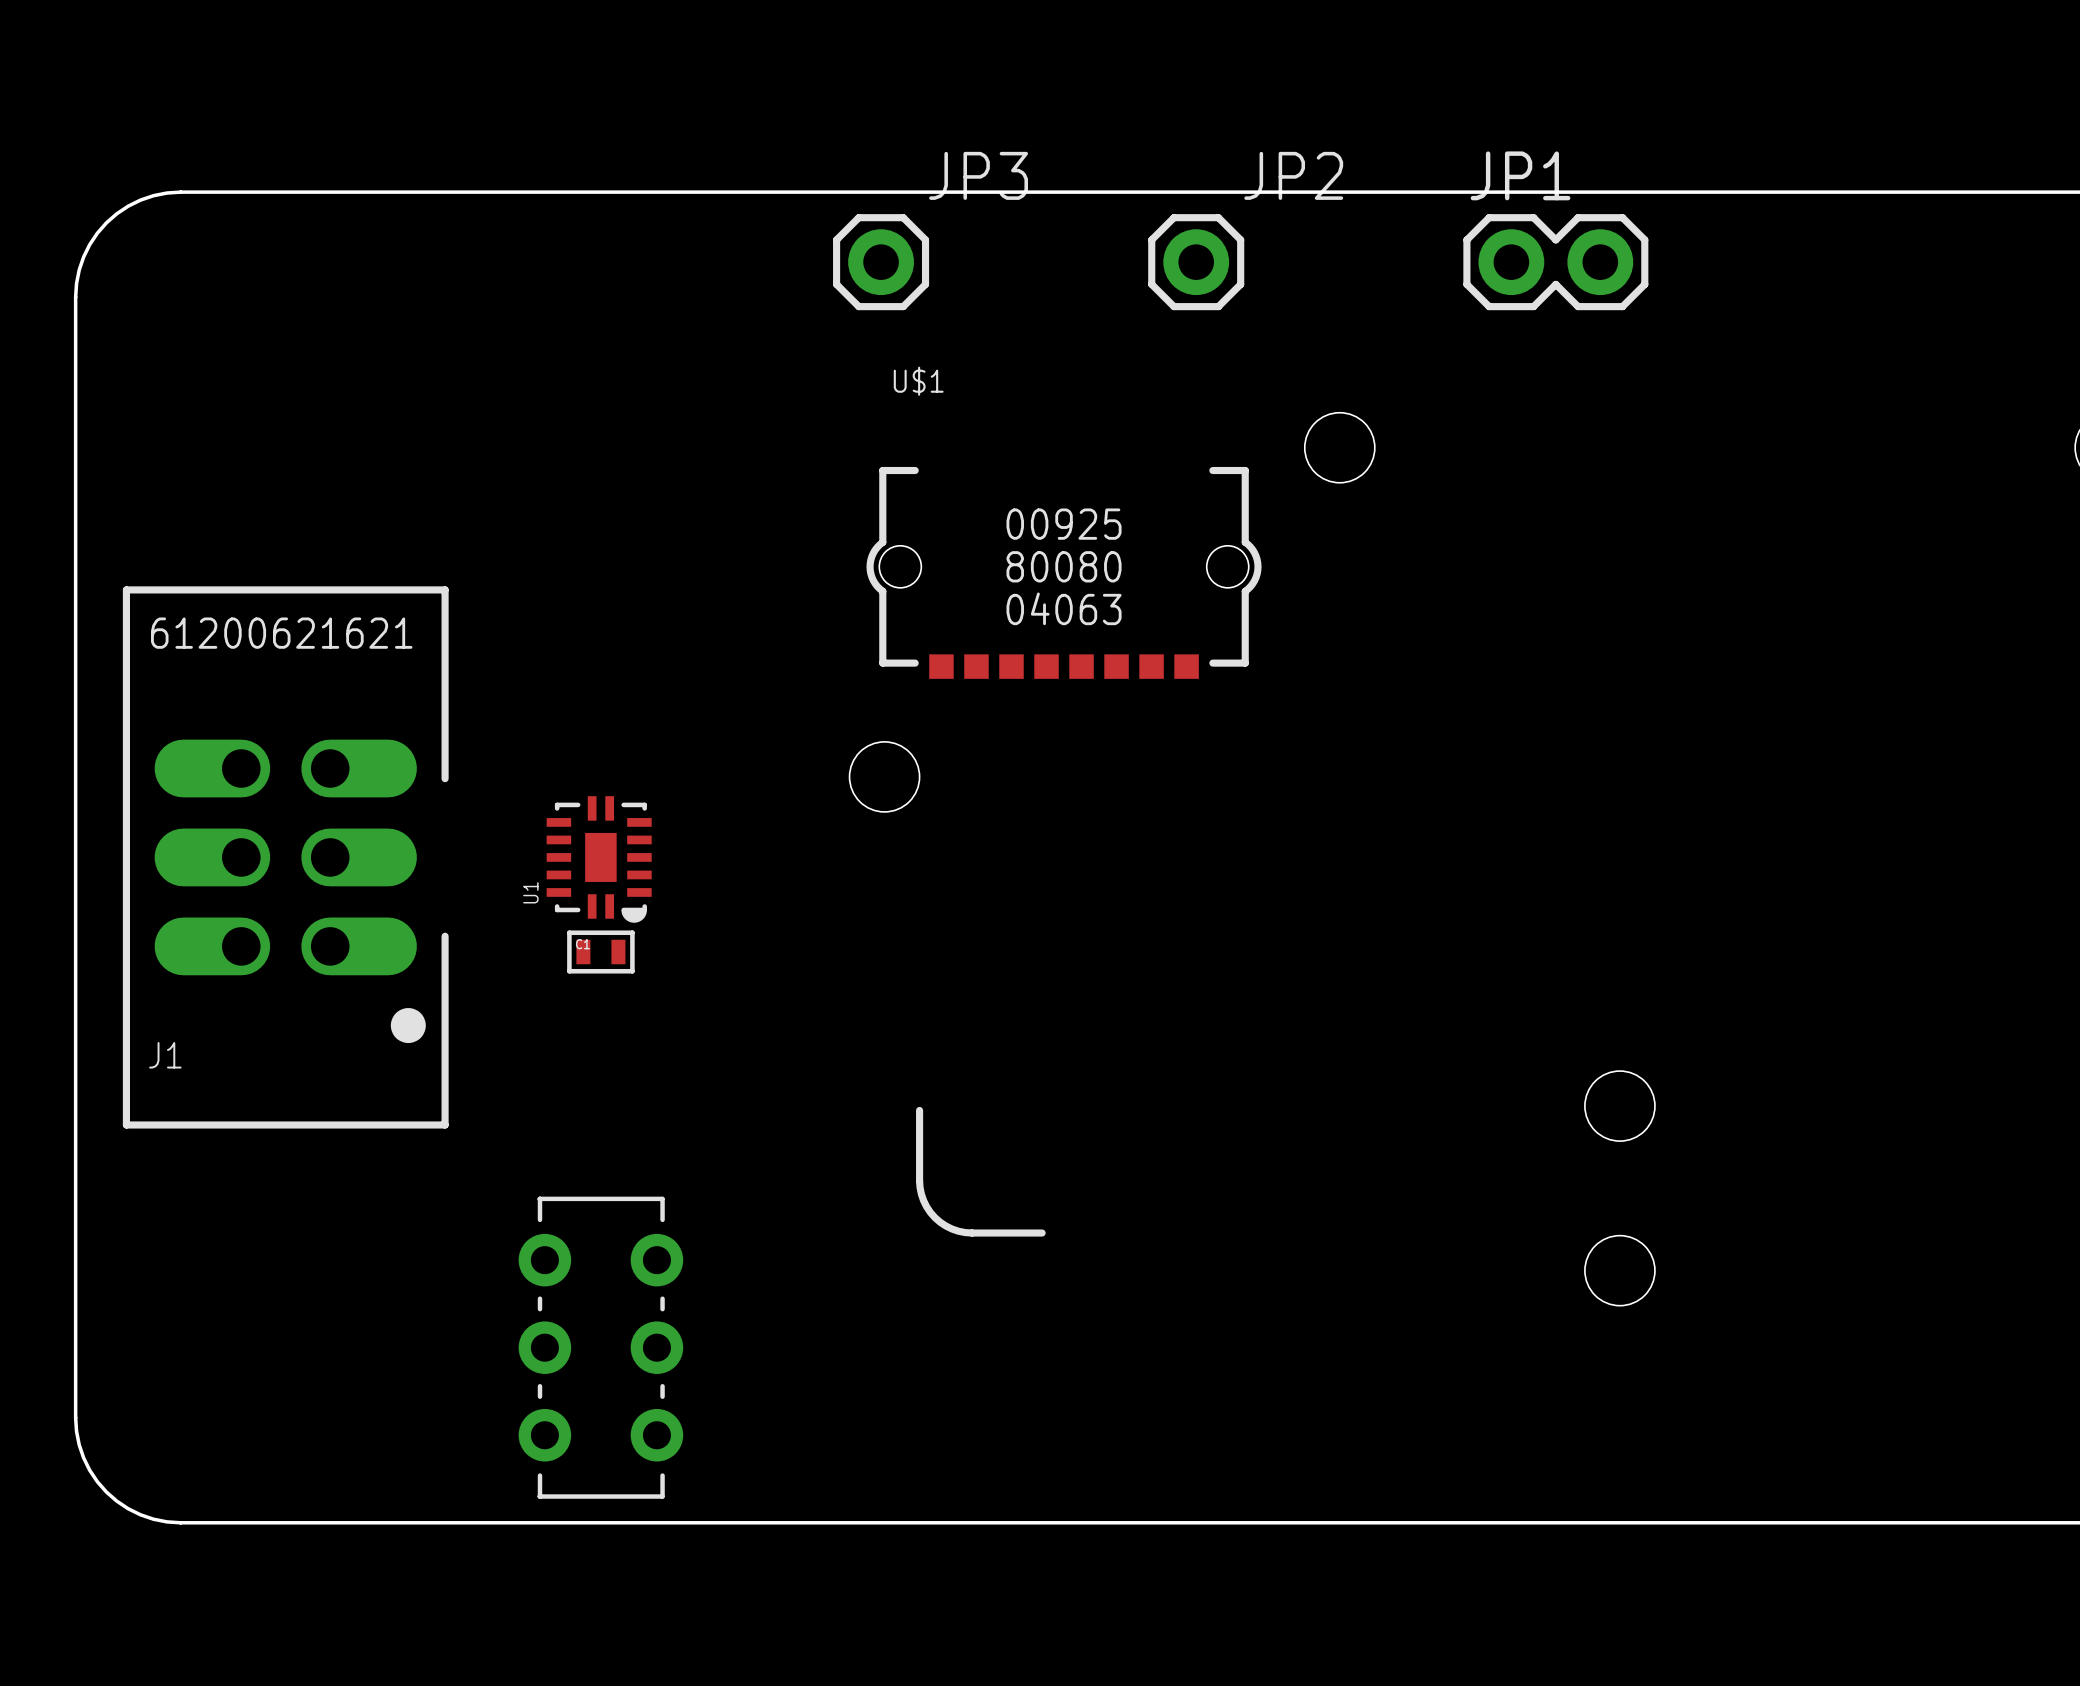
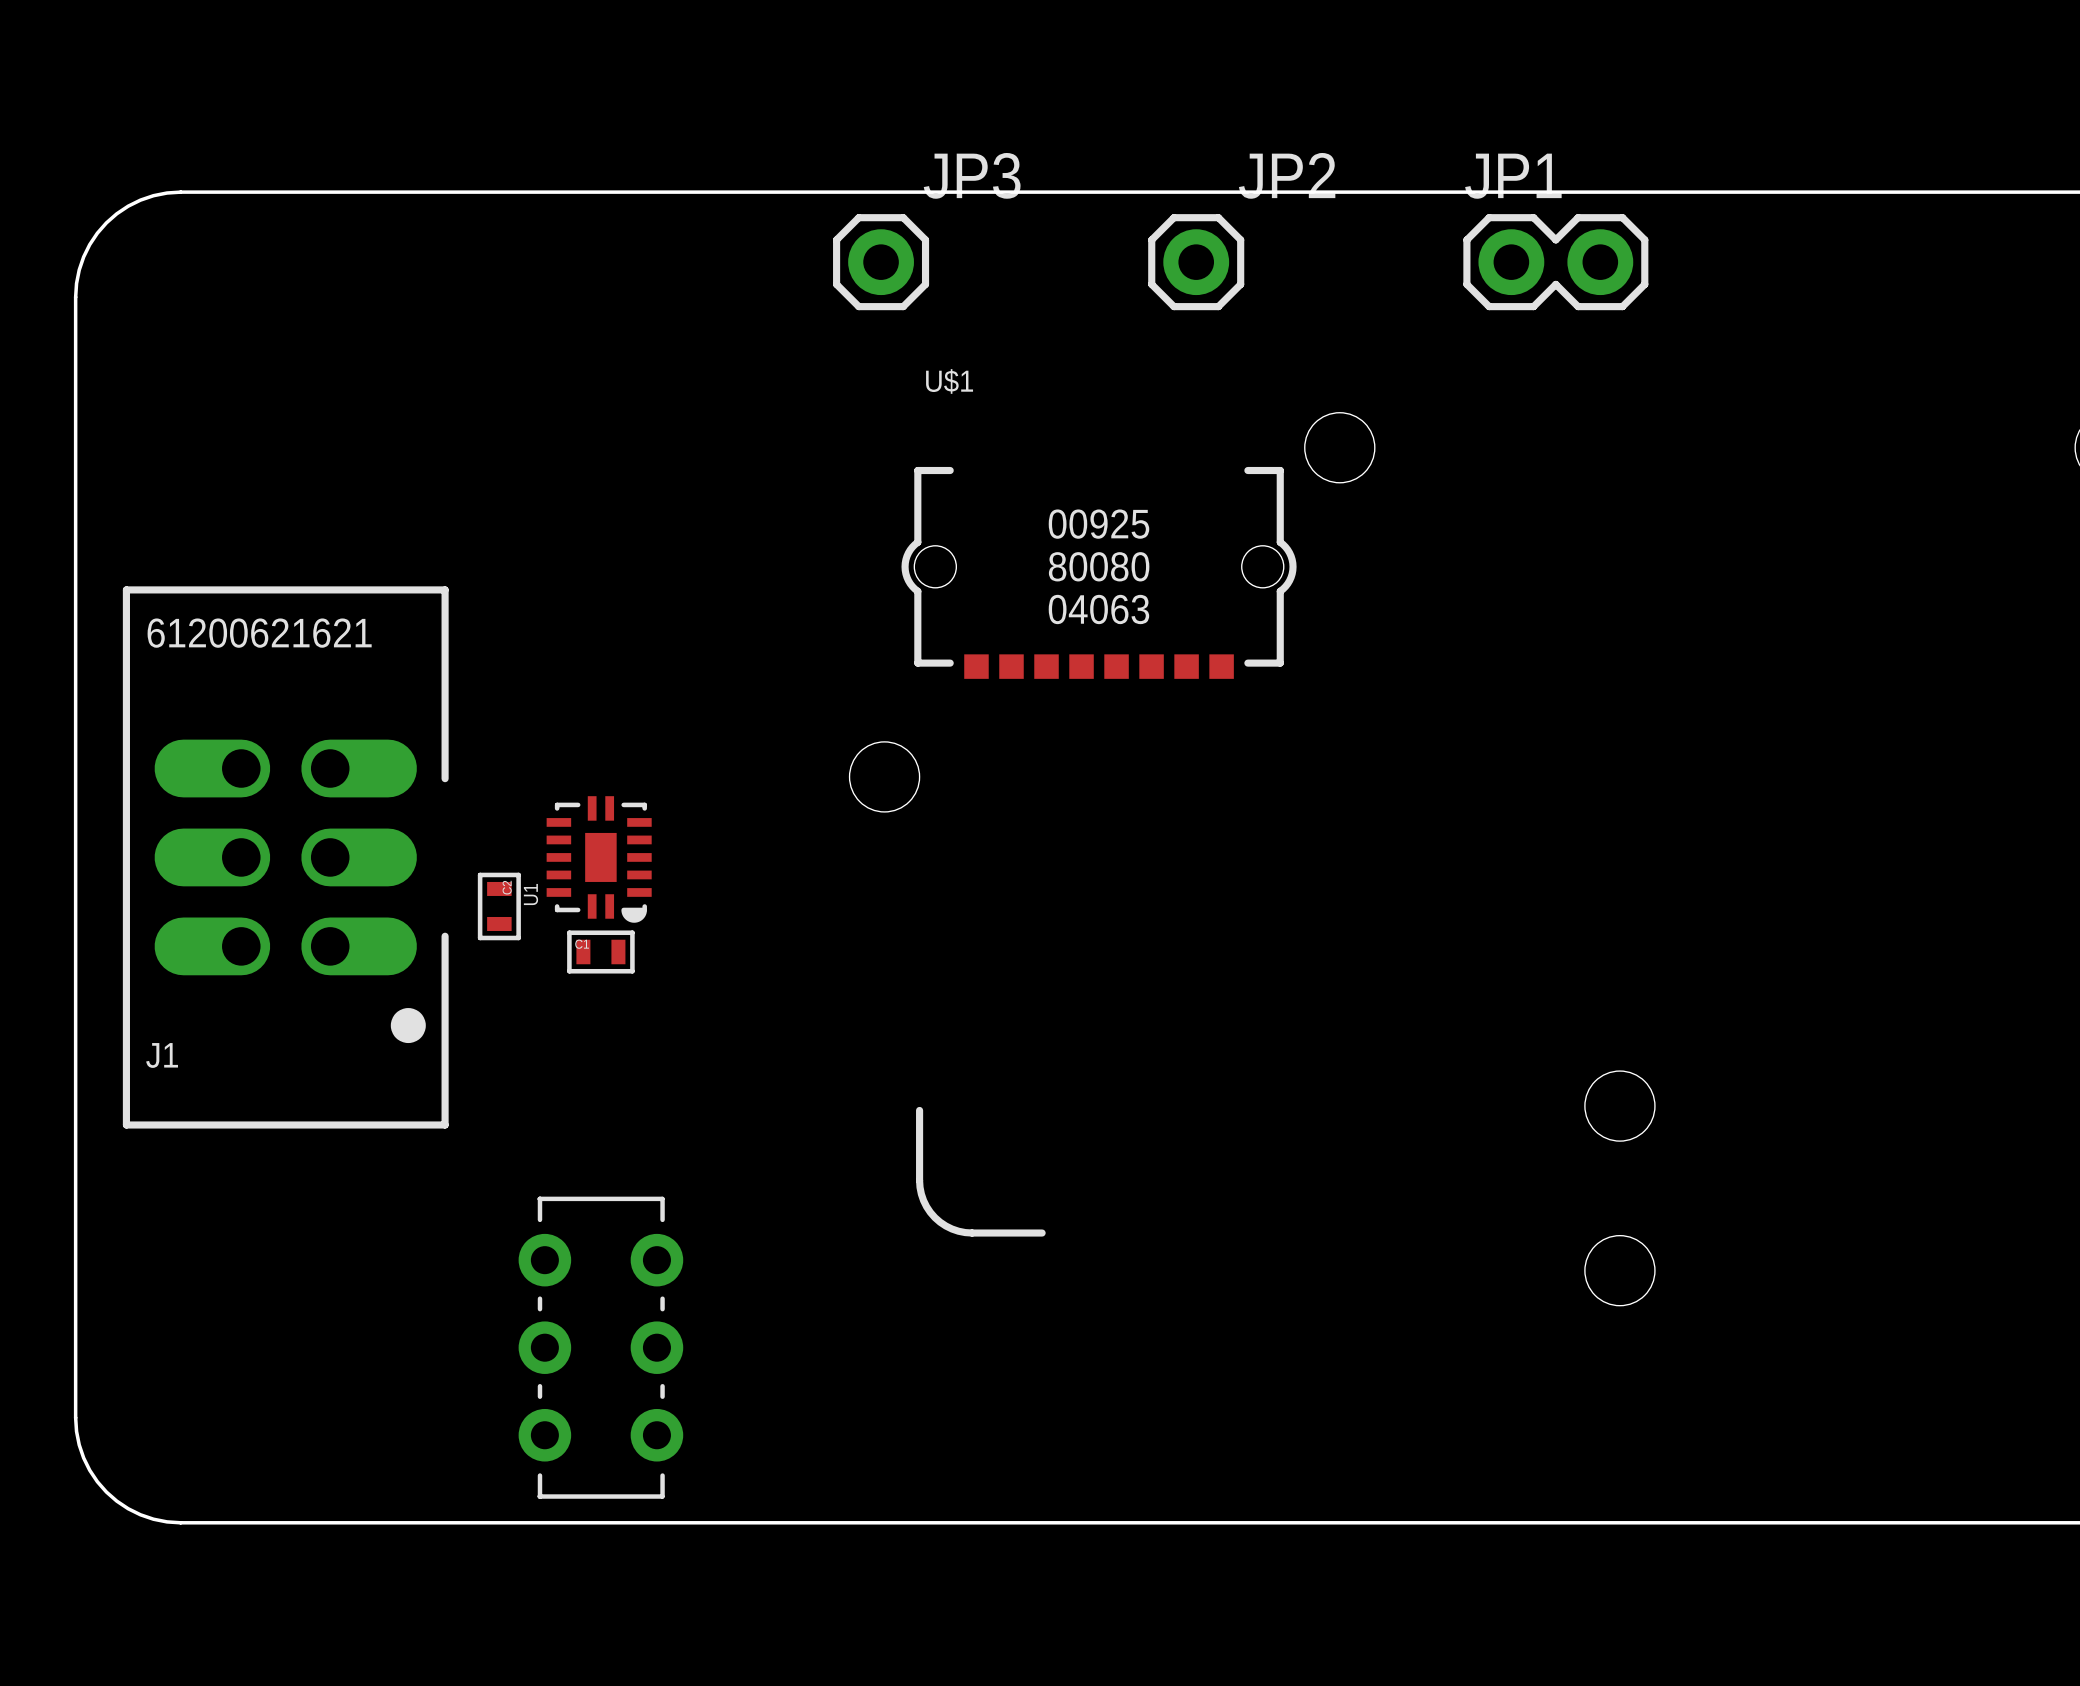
U$1 position: (1064, 572) -> (1099, 572)
C2: none -> (499, 906)

